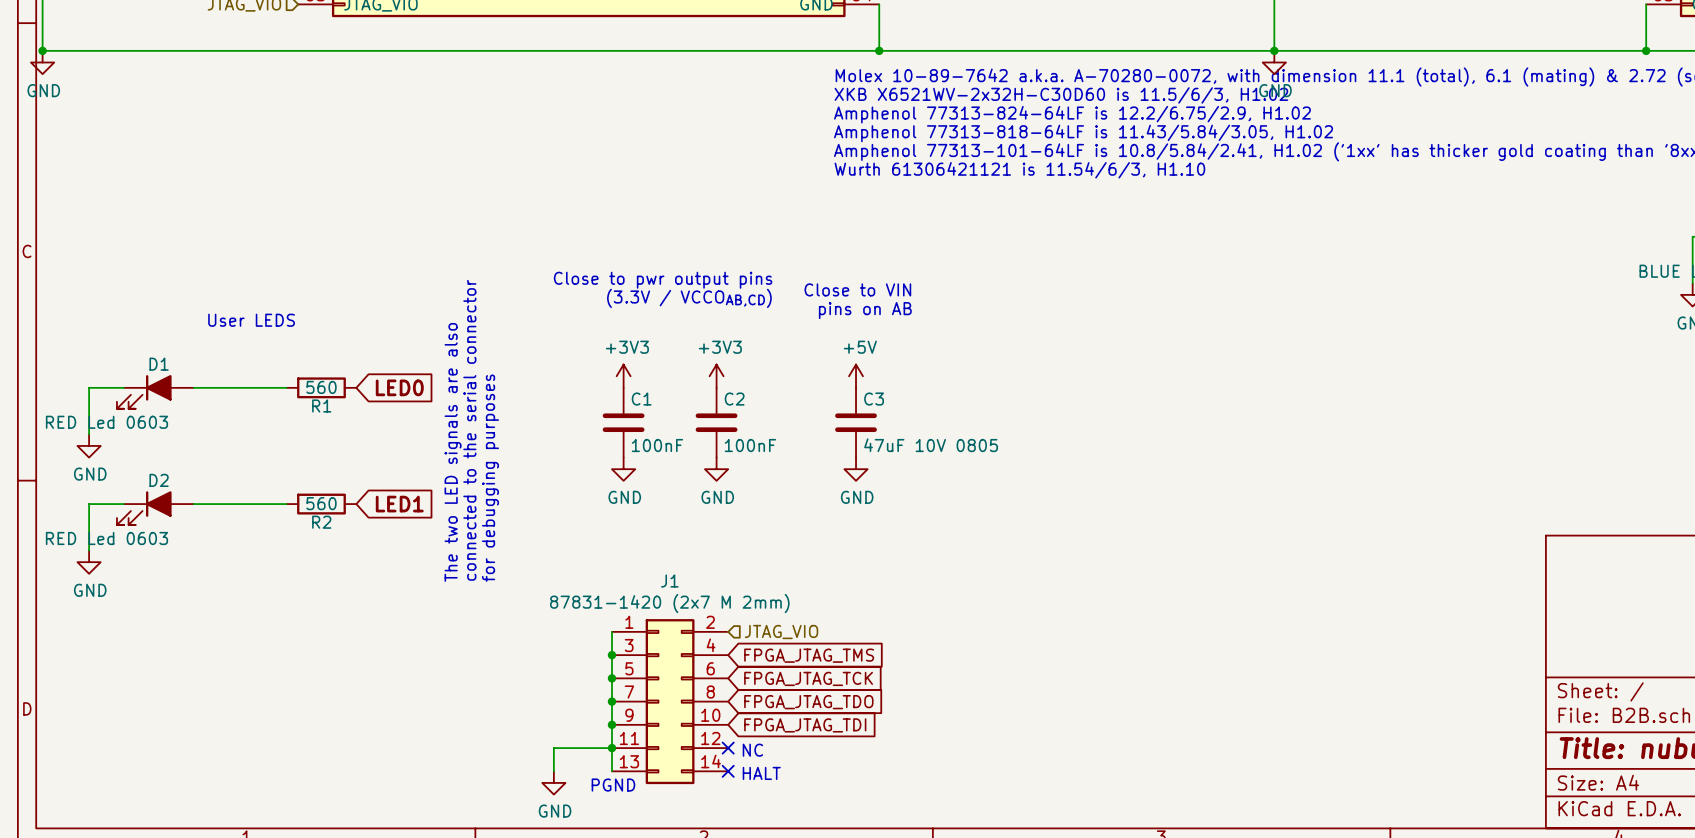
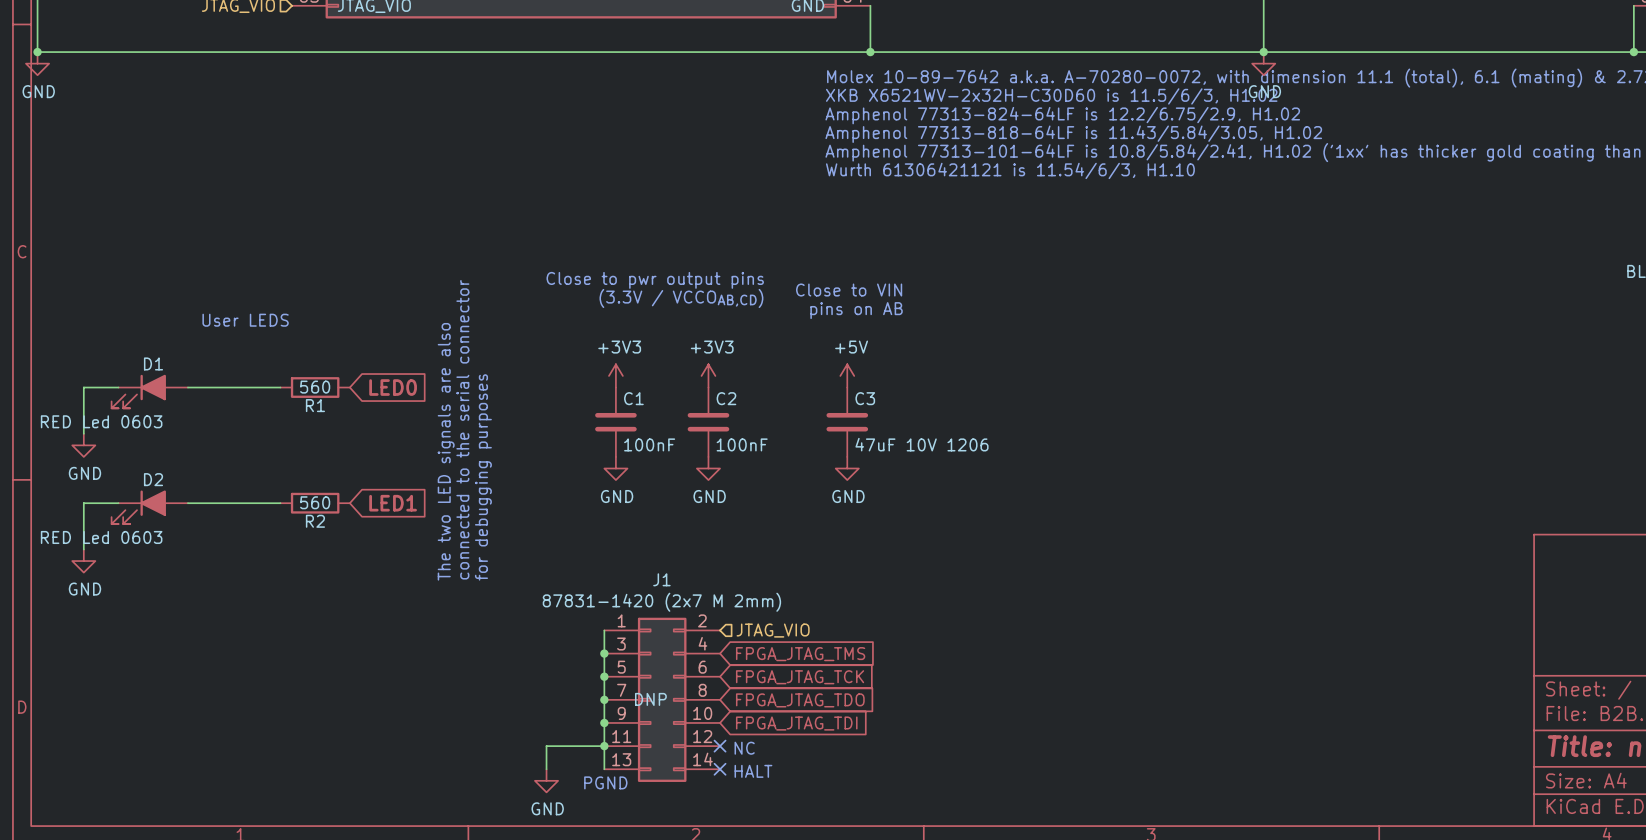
C3 value: 47uF 10V 0805 (931, 445) -> 47uF 10V 1206 (922, 444)
J1 text: none -> DNP (650, 699)

